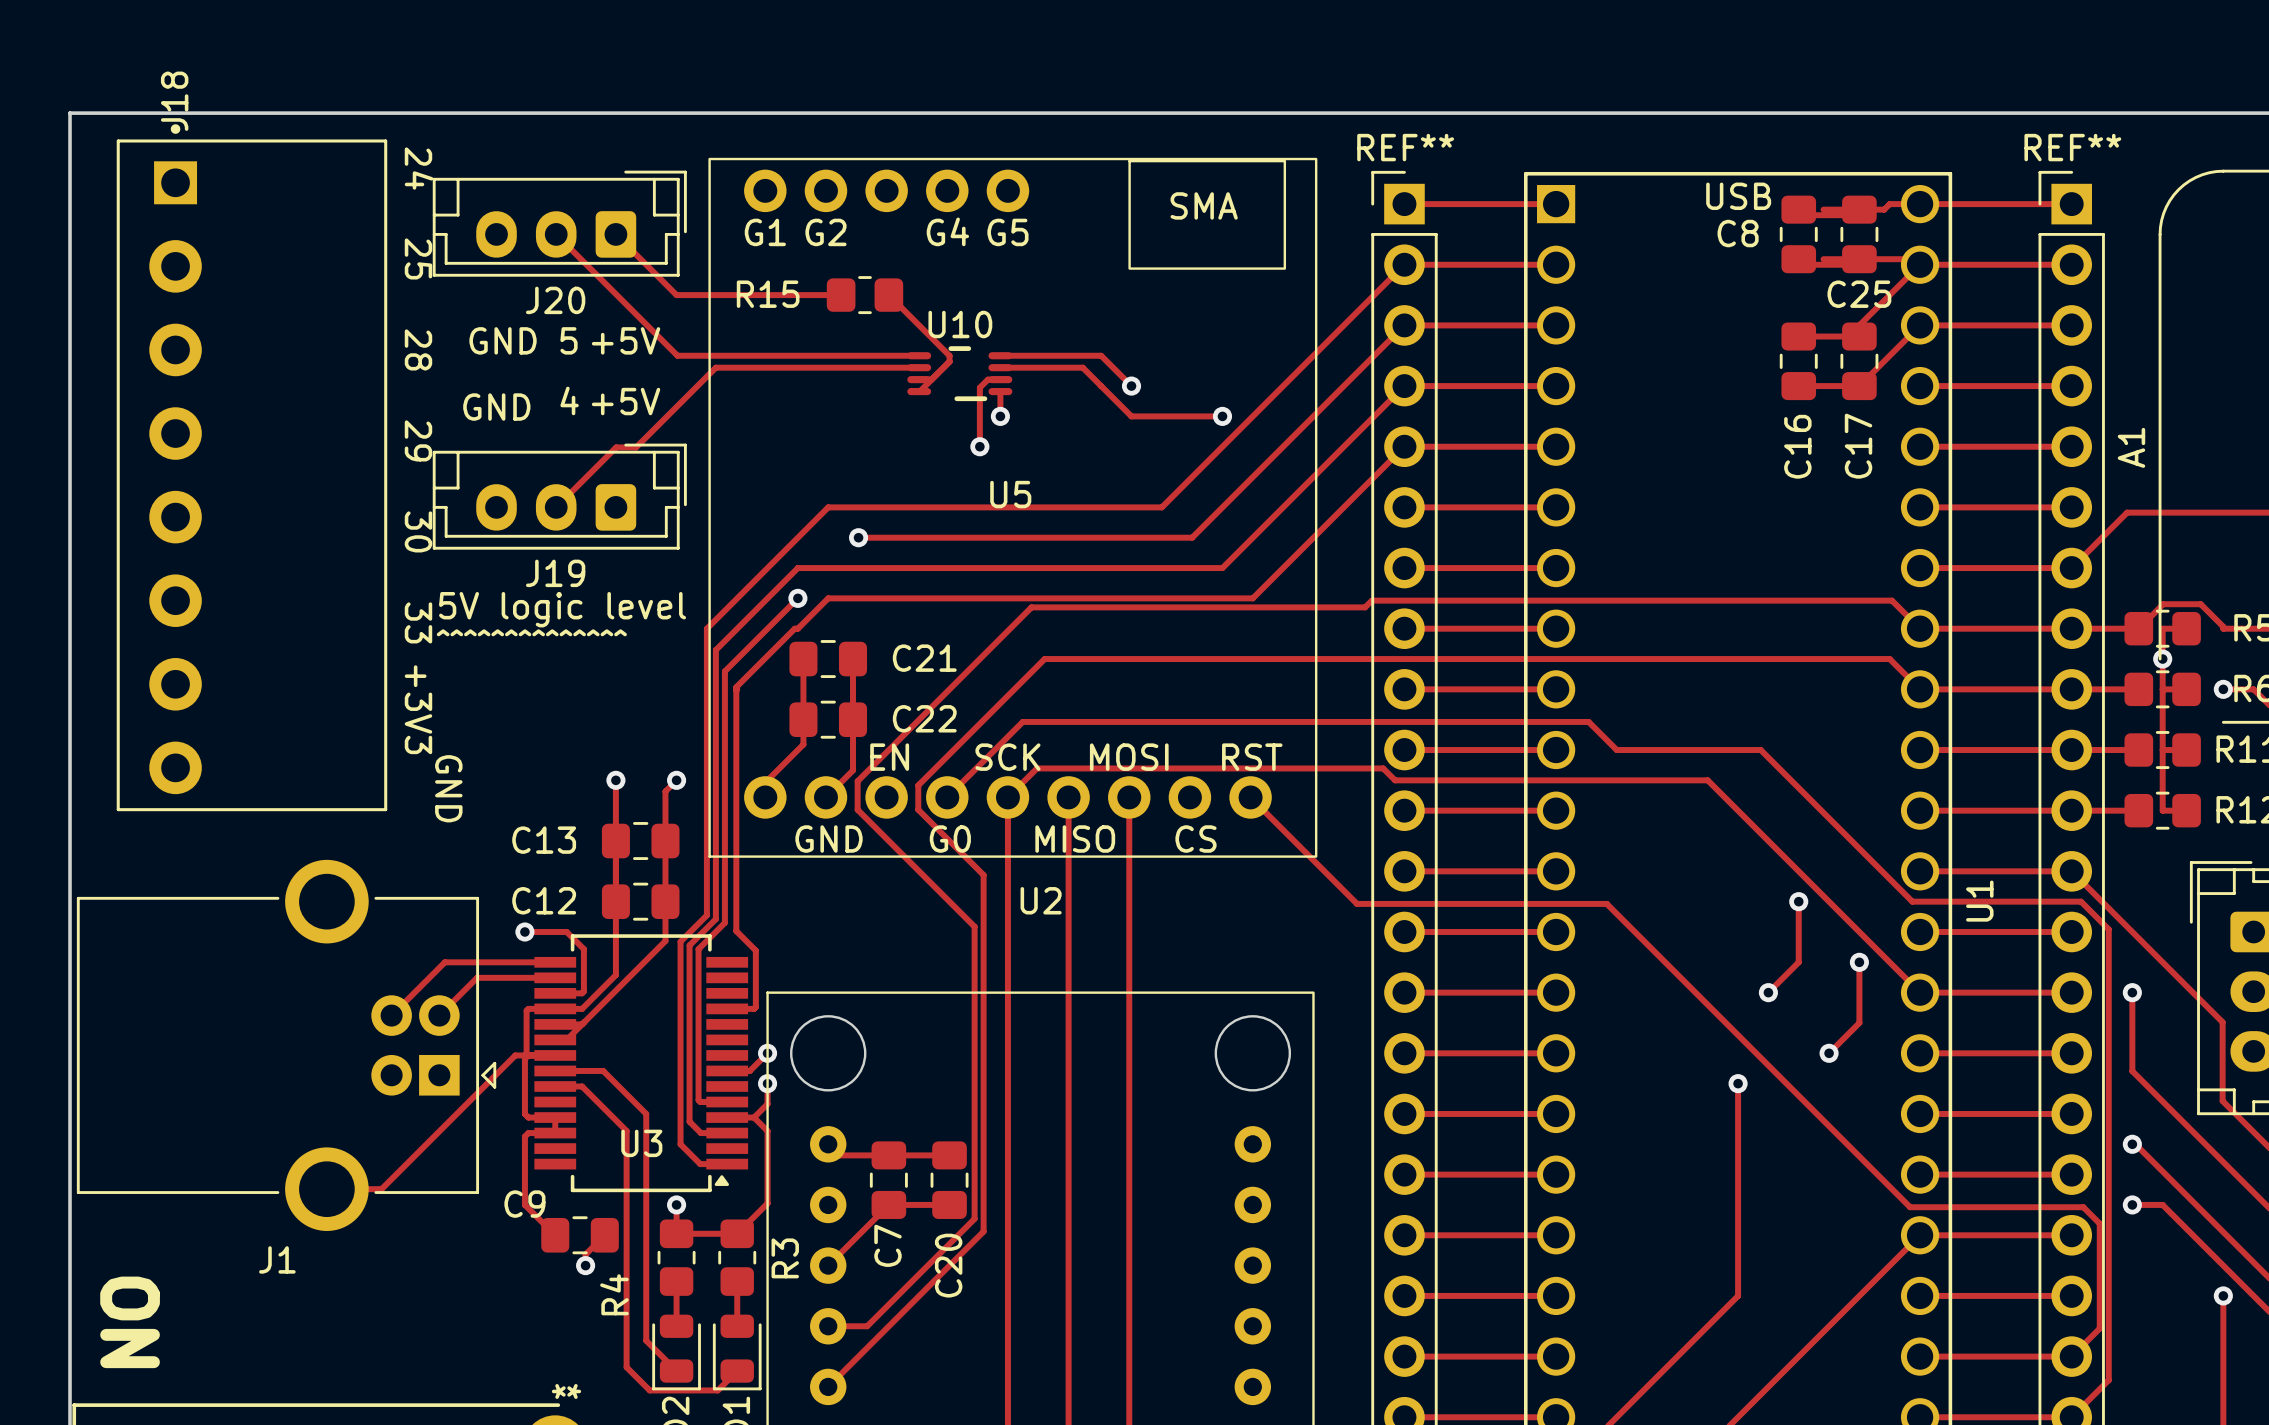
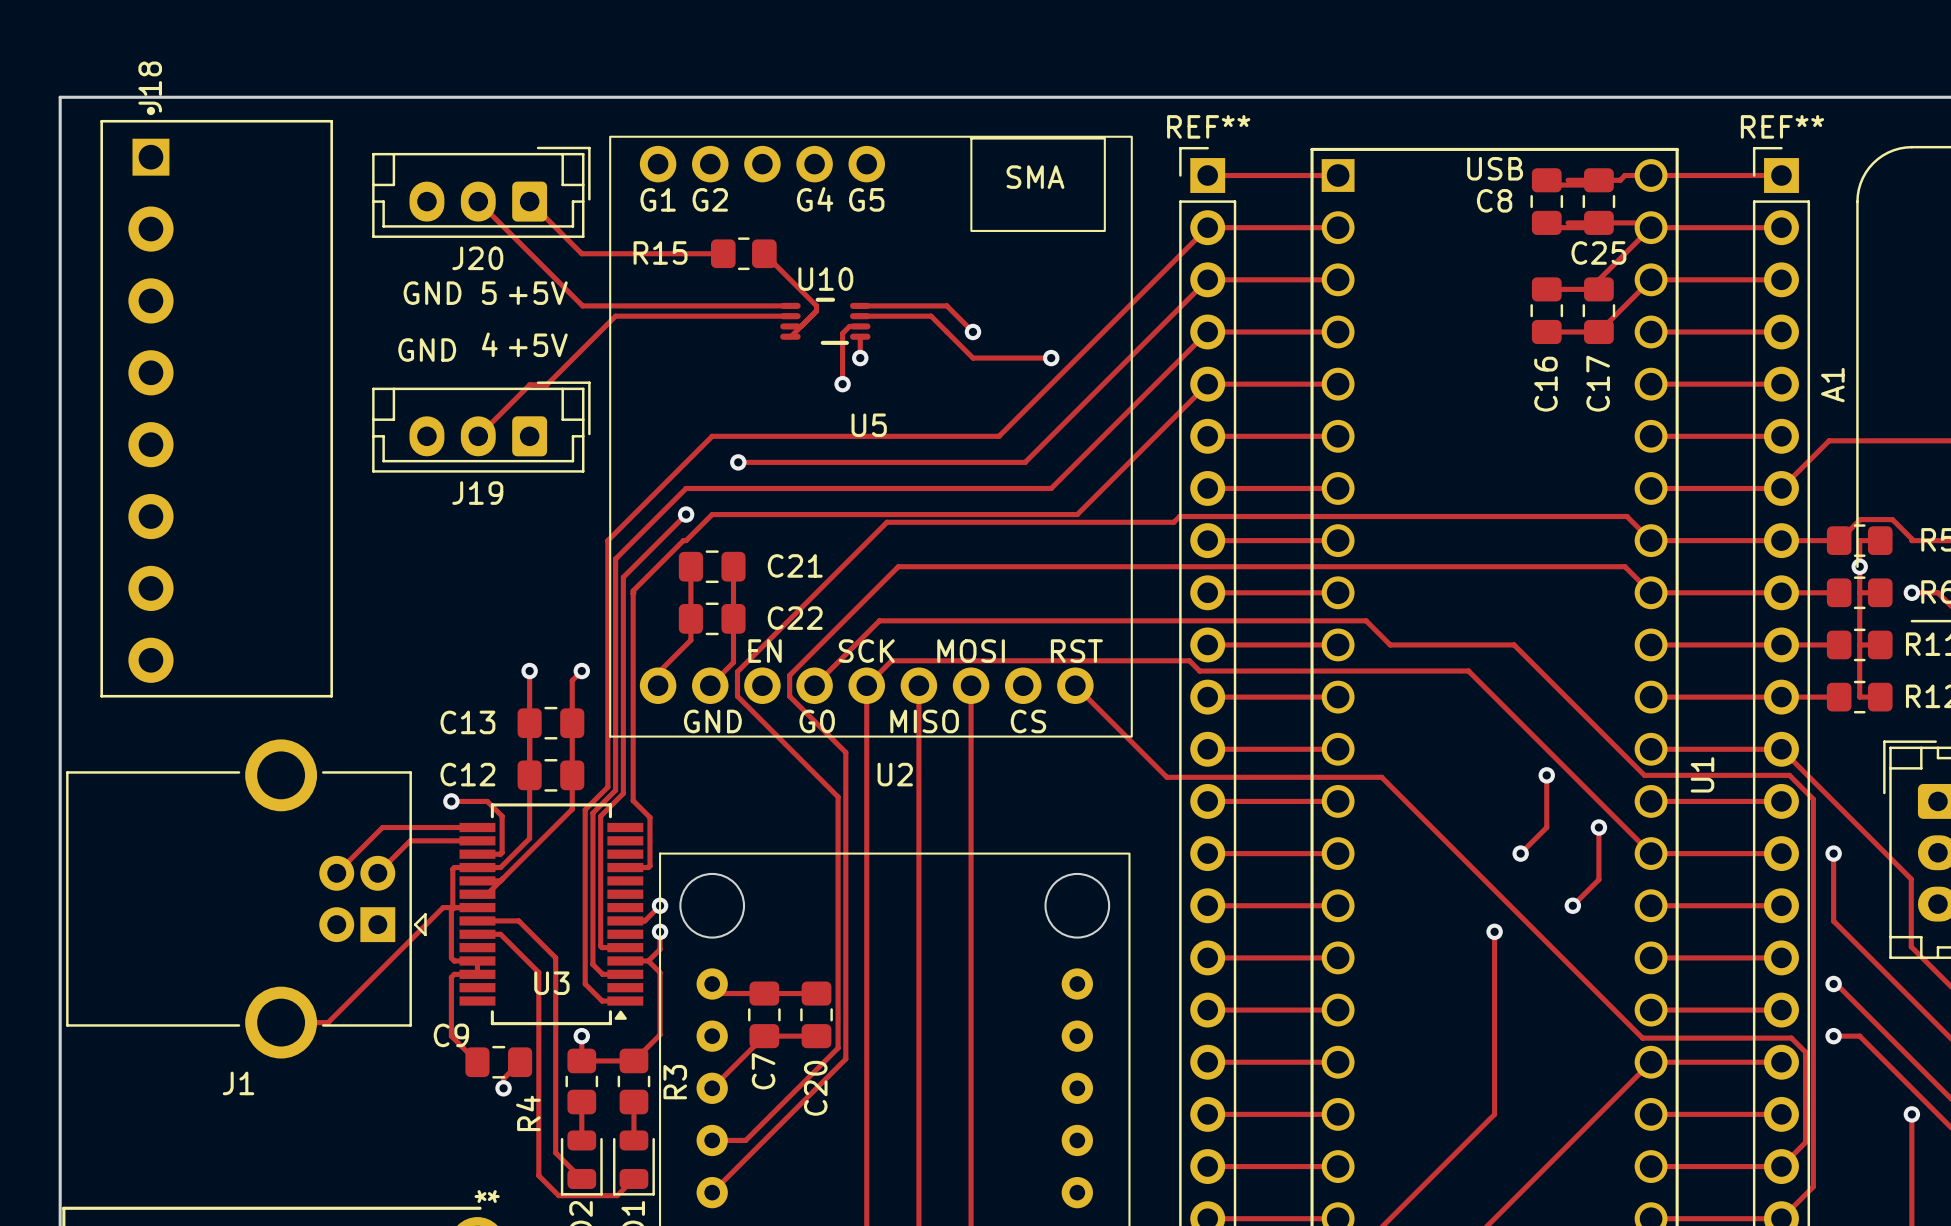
text: 24 (419, 168) -> none
text: 25 (418, 258) -> none
text: 28 (418, 349) -> none
text: 29 (418, 440) -> none
text: 30 (418, 531) -> none
text: 5V logic level (562, 609) -> none
text: 33 (418, 622) -> none
text: ^^^^^^^^^^^^^^ (531, 632) -> none
text: +3V3 (418, 709) -> none
text: GND (448, 788) -> none
text: ON (130, 1322) -> none

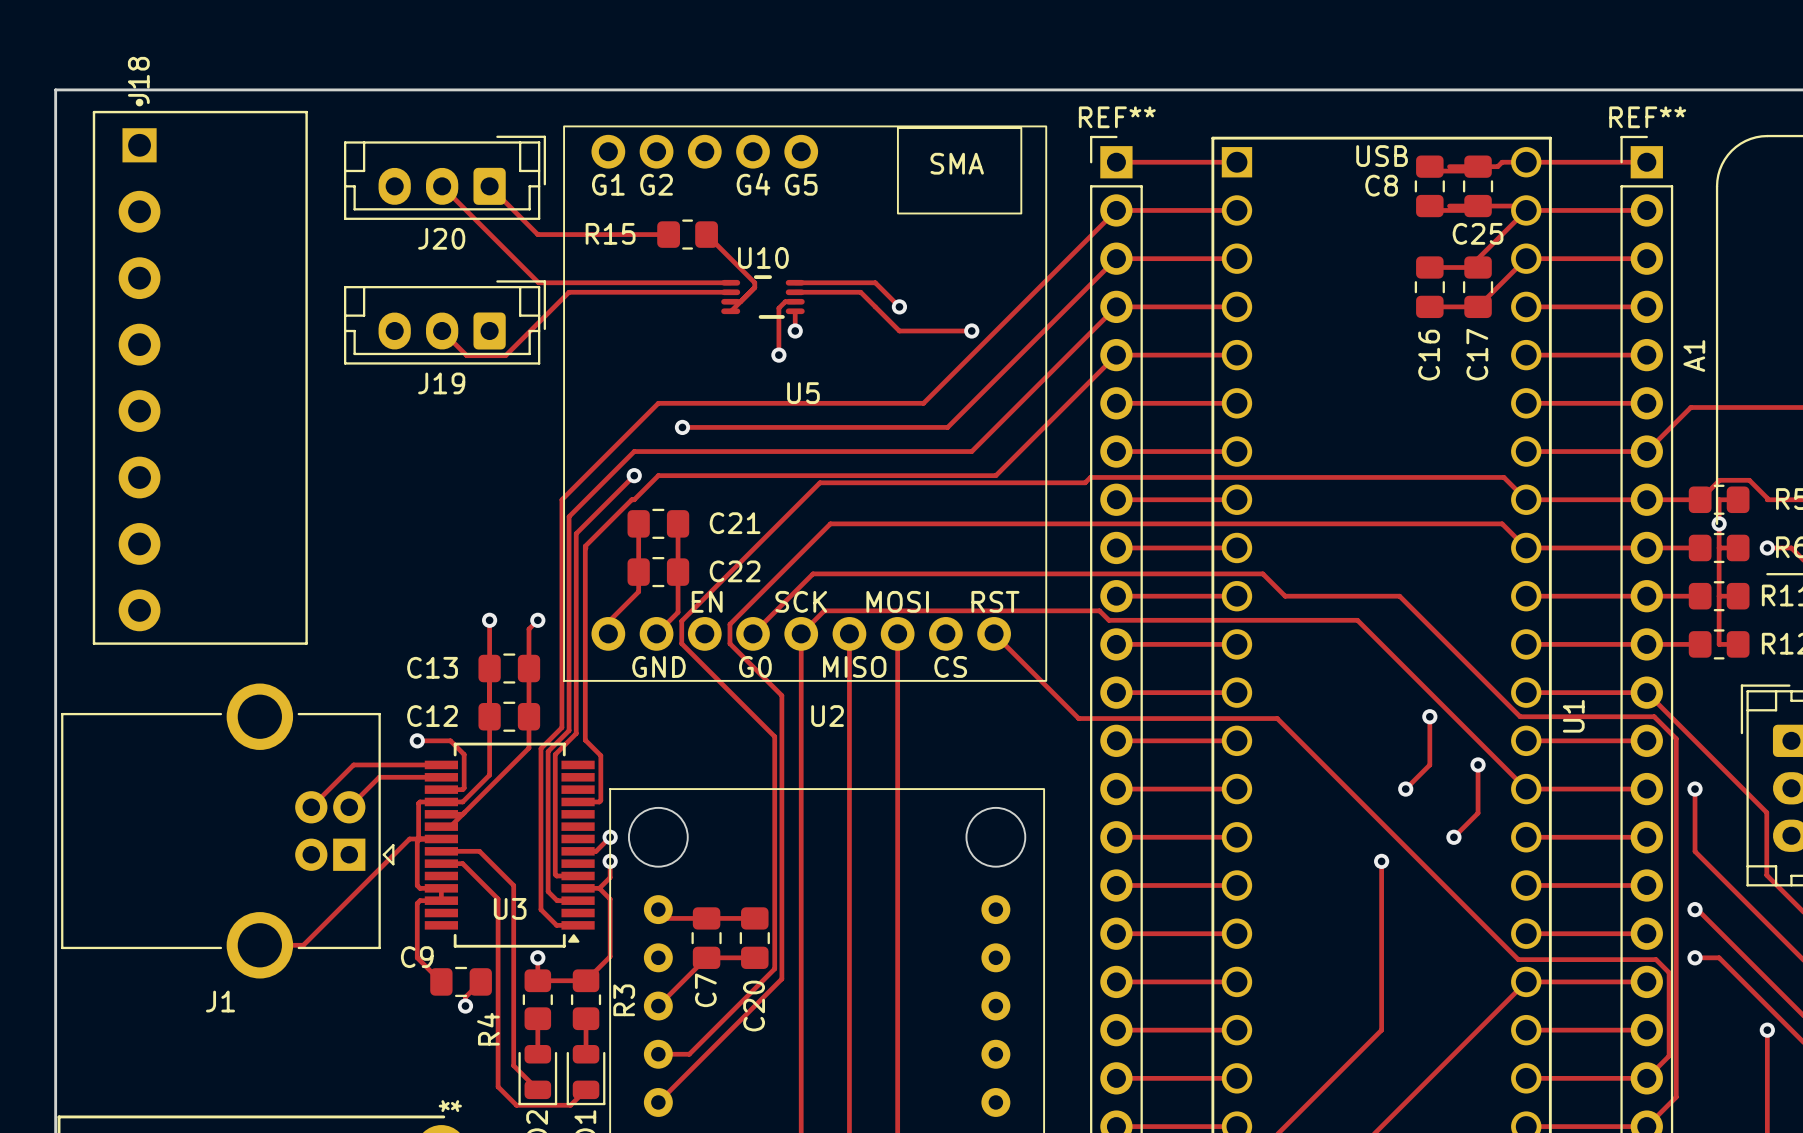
text: GND (432, 293) -> none
text: 5 (489, 293) -> none
text: +5V (538, 293) -> none
text: 4 (489, 344) -> none
text: +5V (538, 345) -> none
text: GND (427, 350) -> none
track: (529, 384) (478, 436) -> (489, 355) (466, 355) (442, 331)
J19 position: (481, 427) -> (444, 322)

